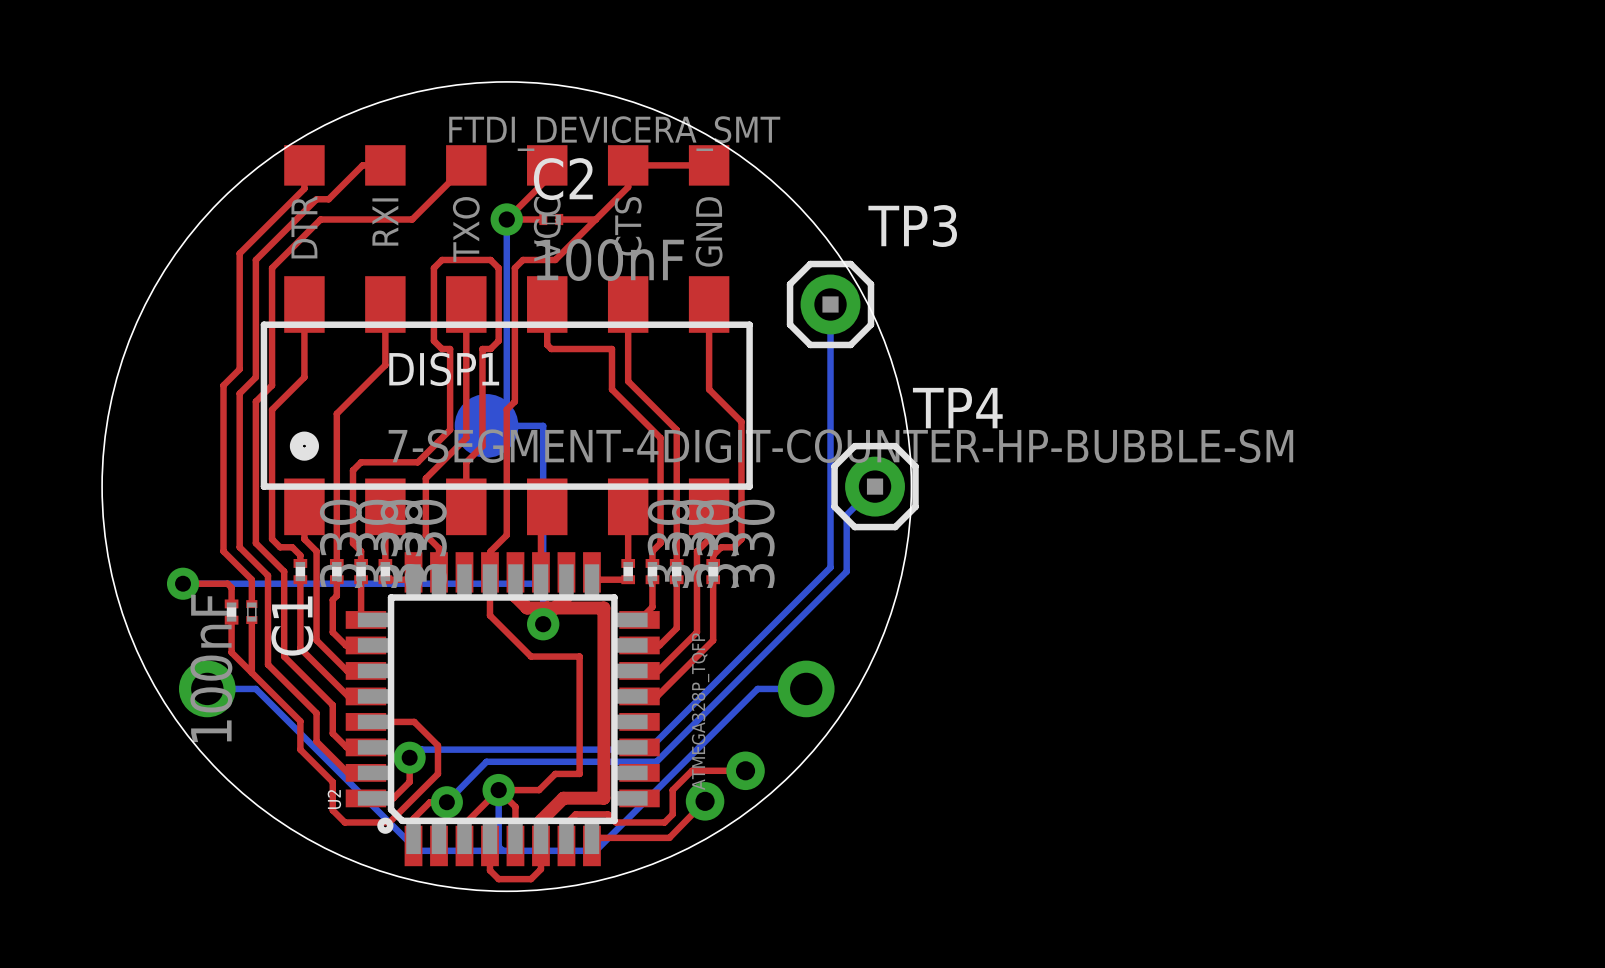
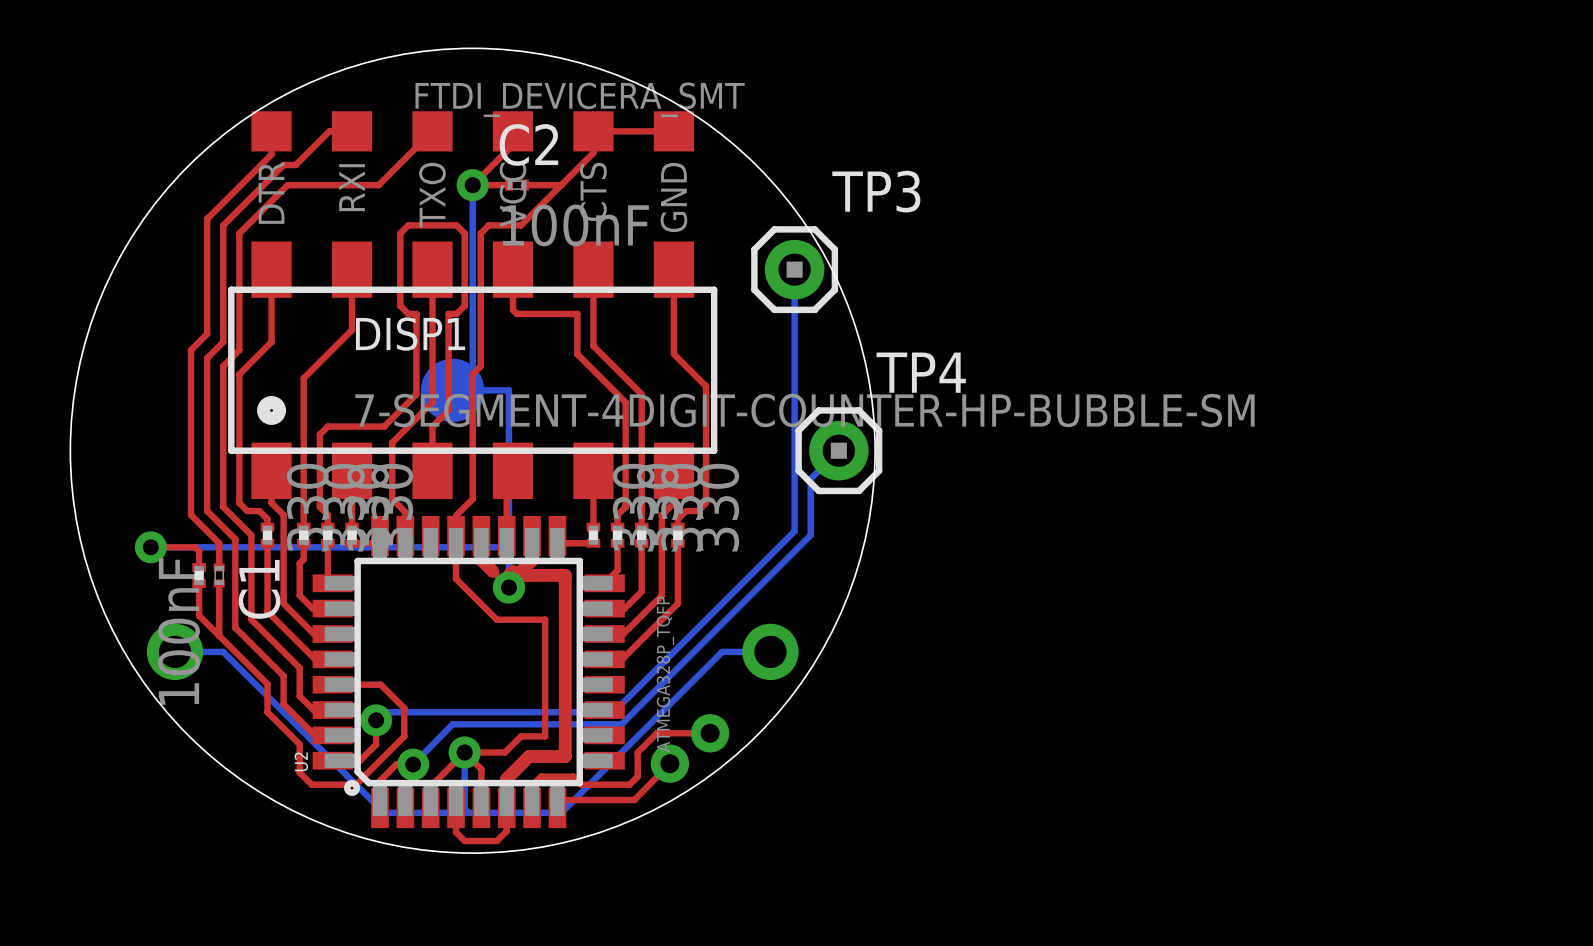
top track: (527, 608) (603, 608) (603, 798) (563, 798) (540, 820) -> (492, 571) (508, 587) (521, 575) (565, 575) (565, 756) (529, 756) (506, 778) (506, 782)

